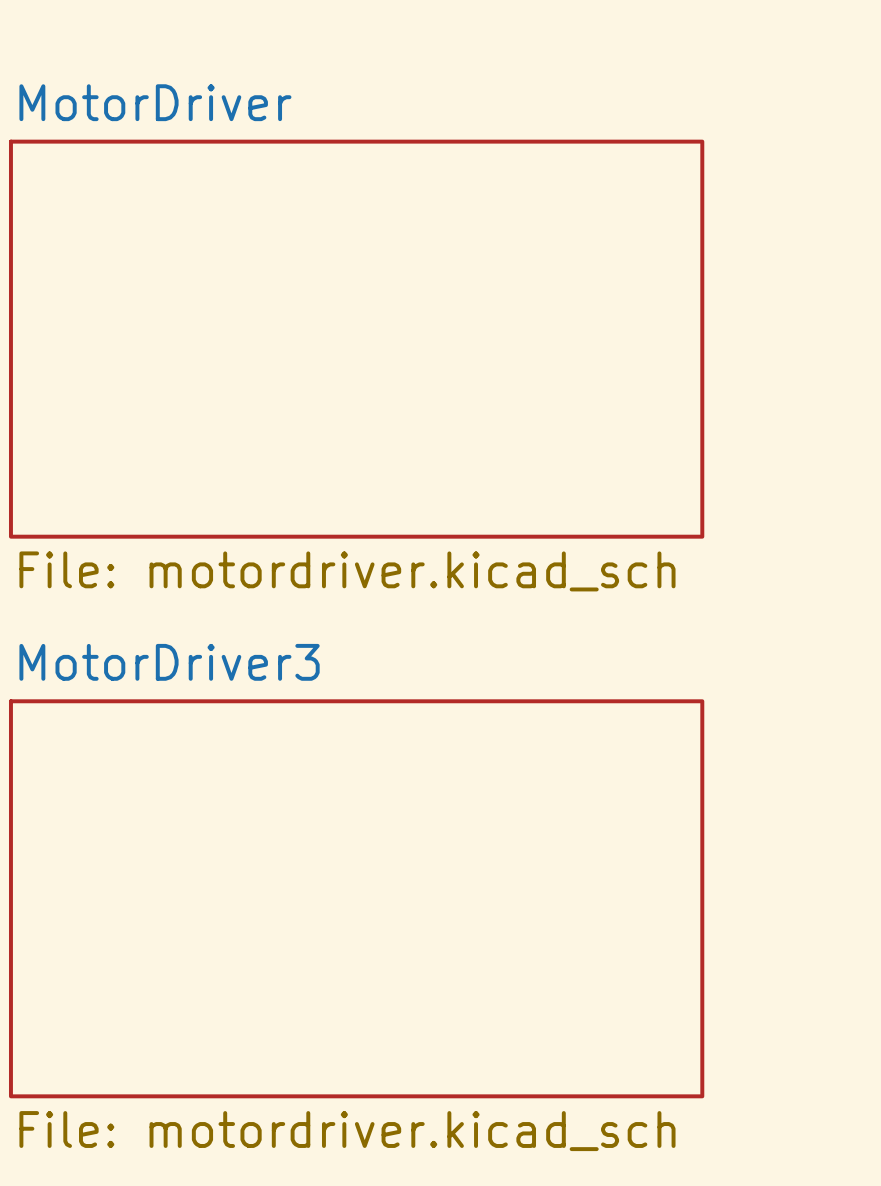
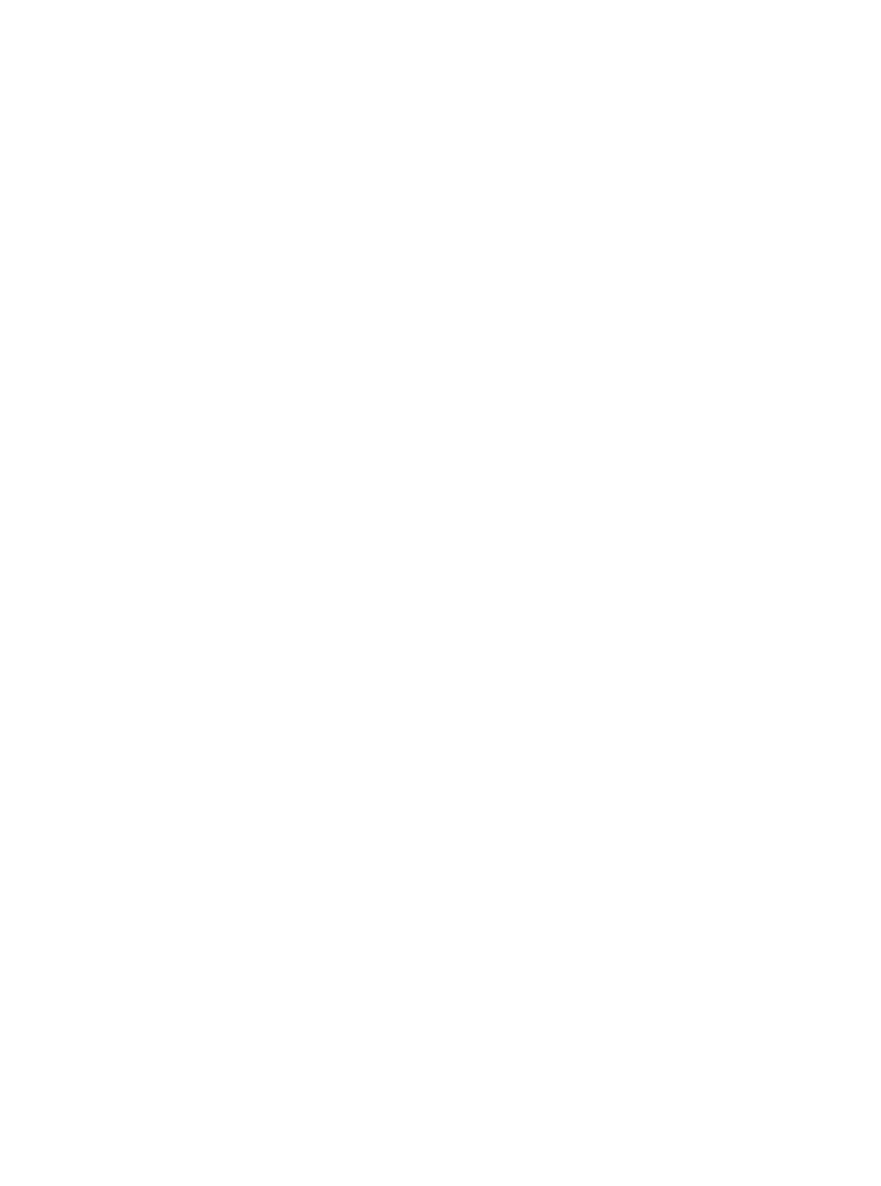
sheet MotorDriver: File: motordriver.kicad_sch (356, 339) -> none
sheet MotorDriver3: File: motordriver.kicad_sch (356, 898) -> none

